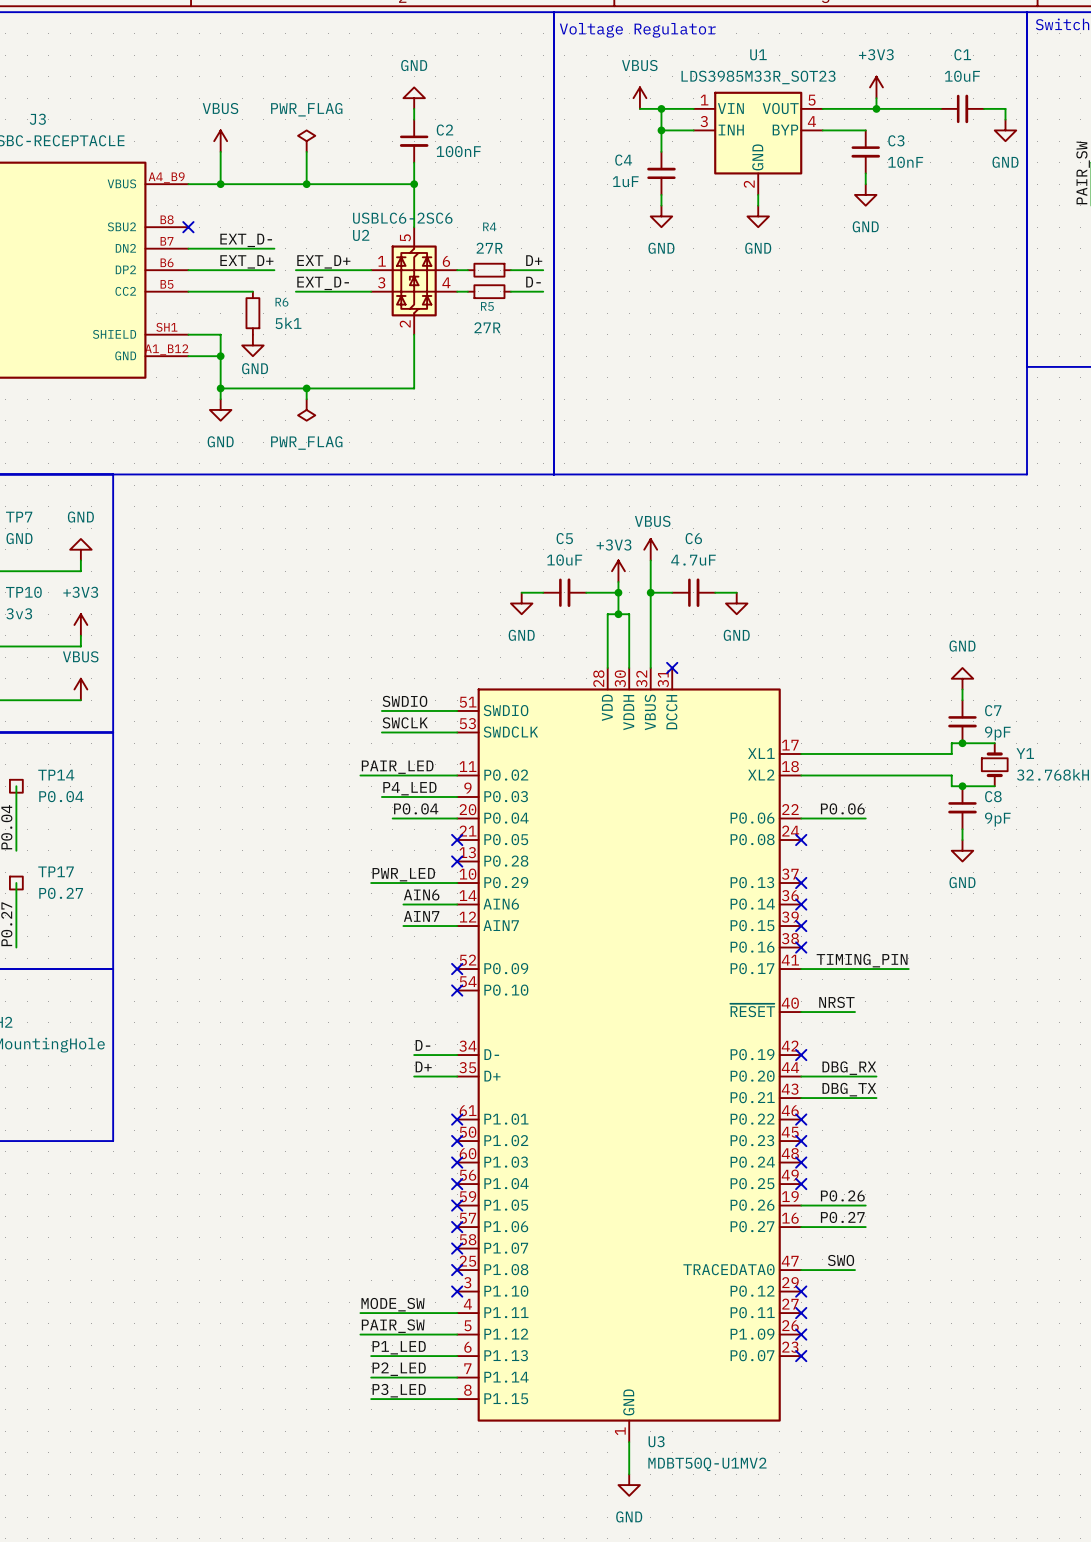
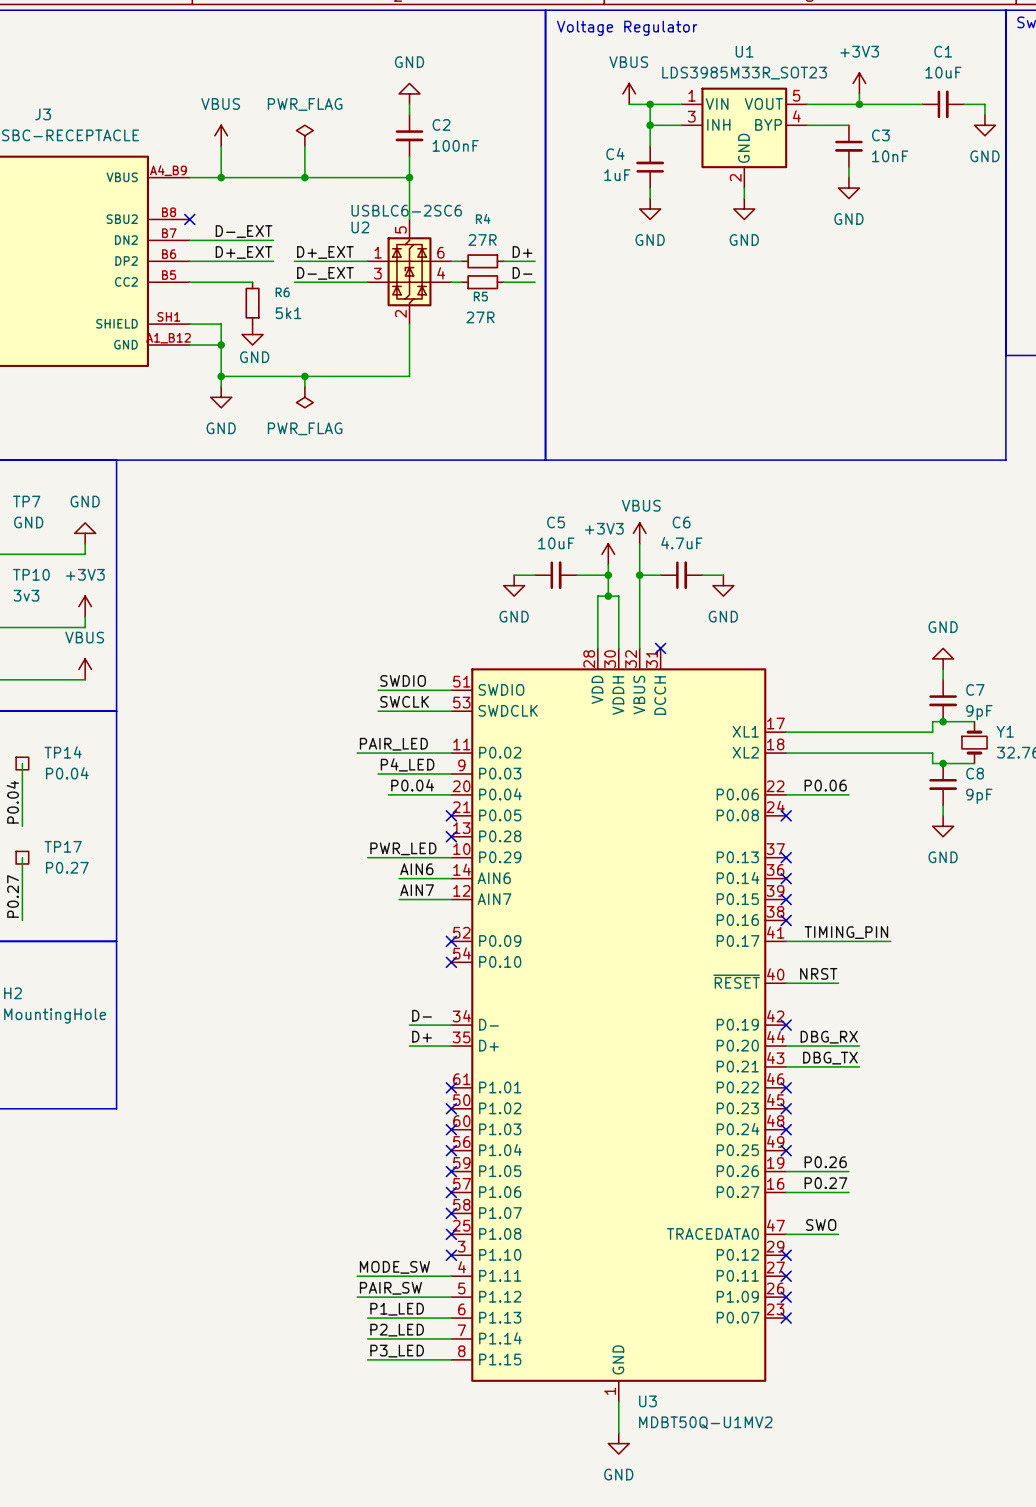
label: EXT_D- (246, 240) -> D-_EXT (244, 231)
label: EXT_D+ (246, 261) -> D+_EXT (244, 252)
label: EXT_D+ (323, 261) -> D+_EXT (325, 252)
label: EXT_D- (323, 283) -> D-_EXT (325, 273)

